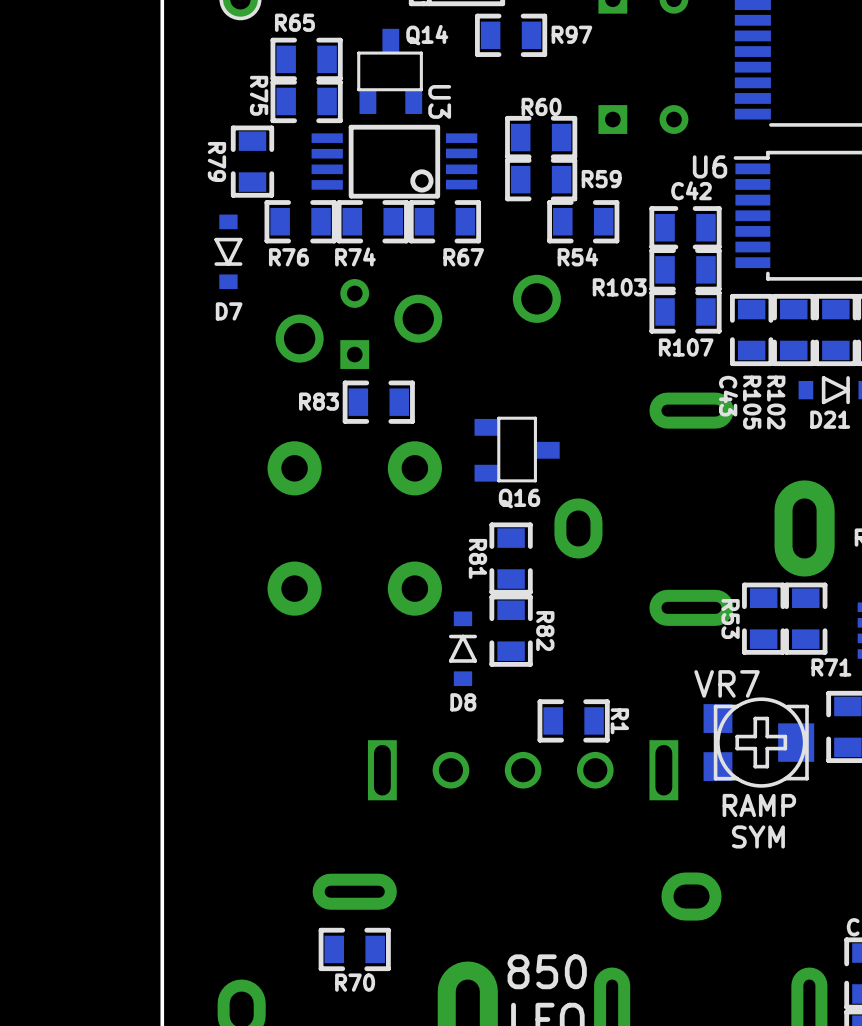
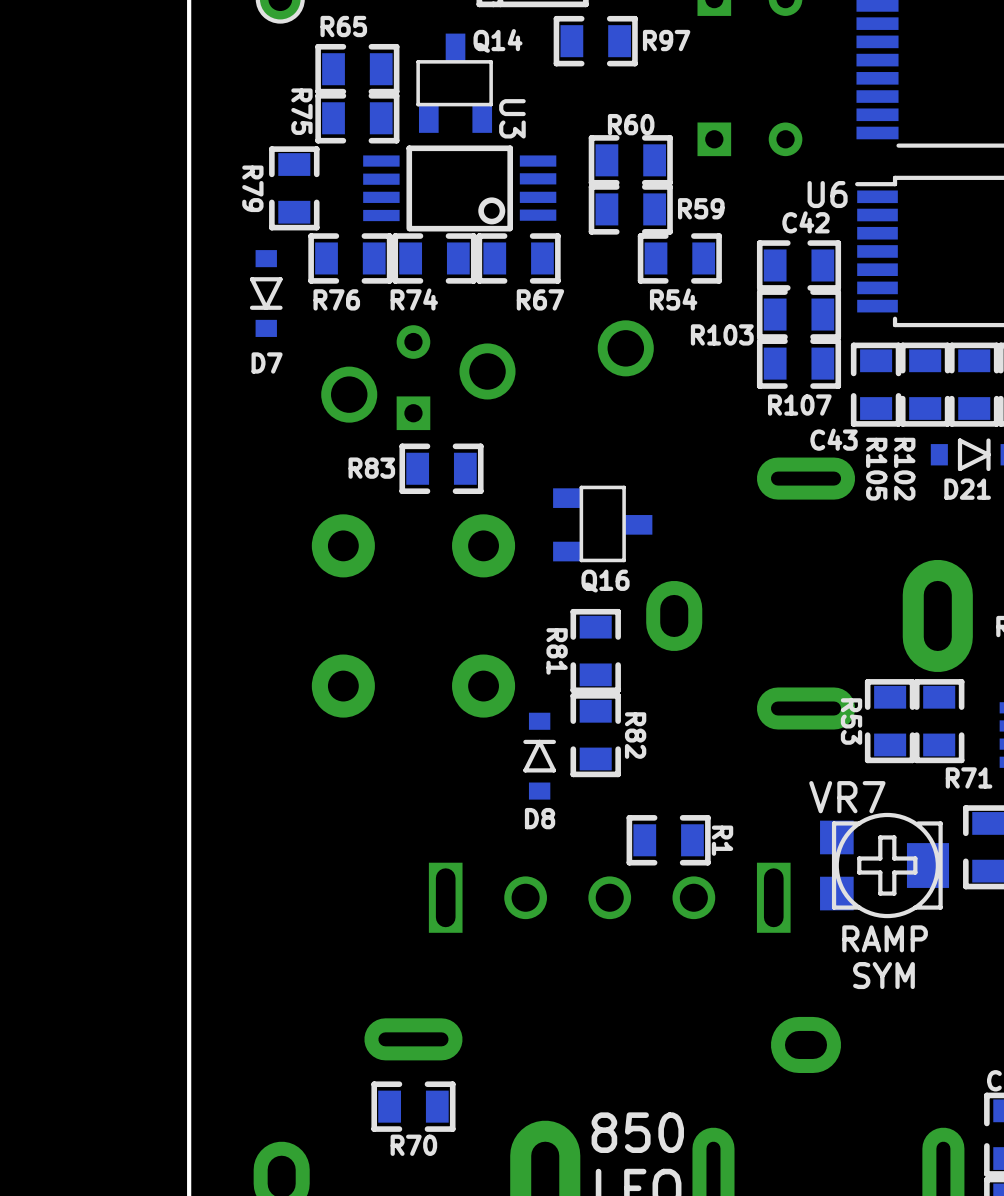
C43 name rotation: 0° (728, 396) -> 90° counterclockwise (834, 439)

